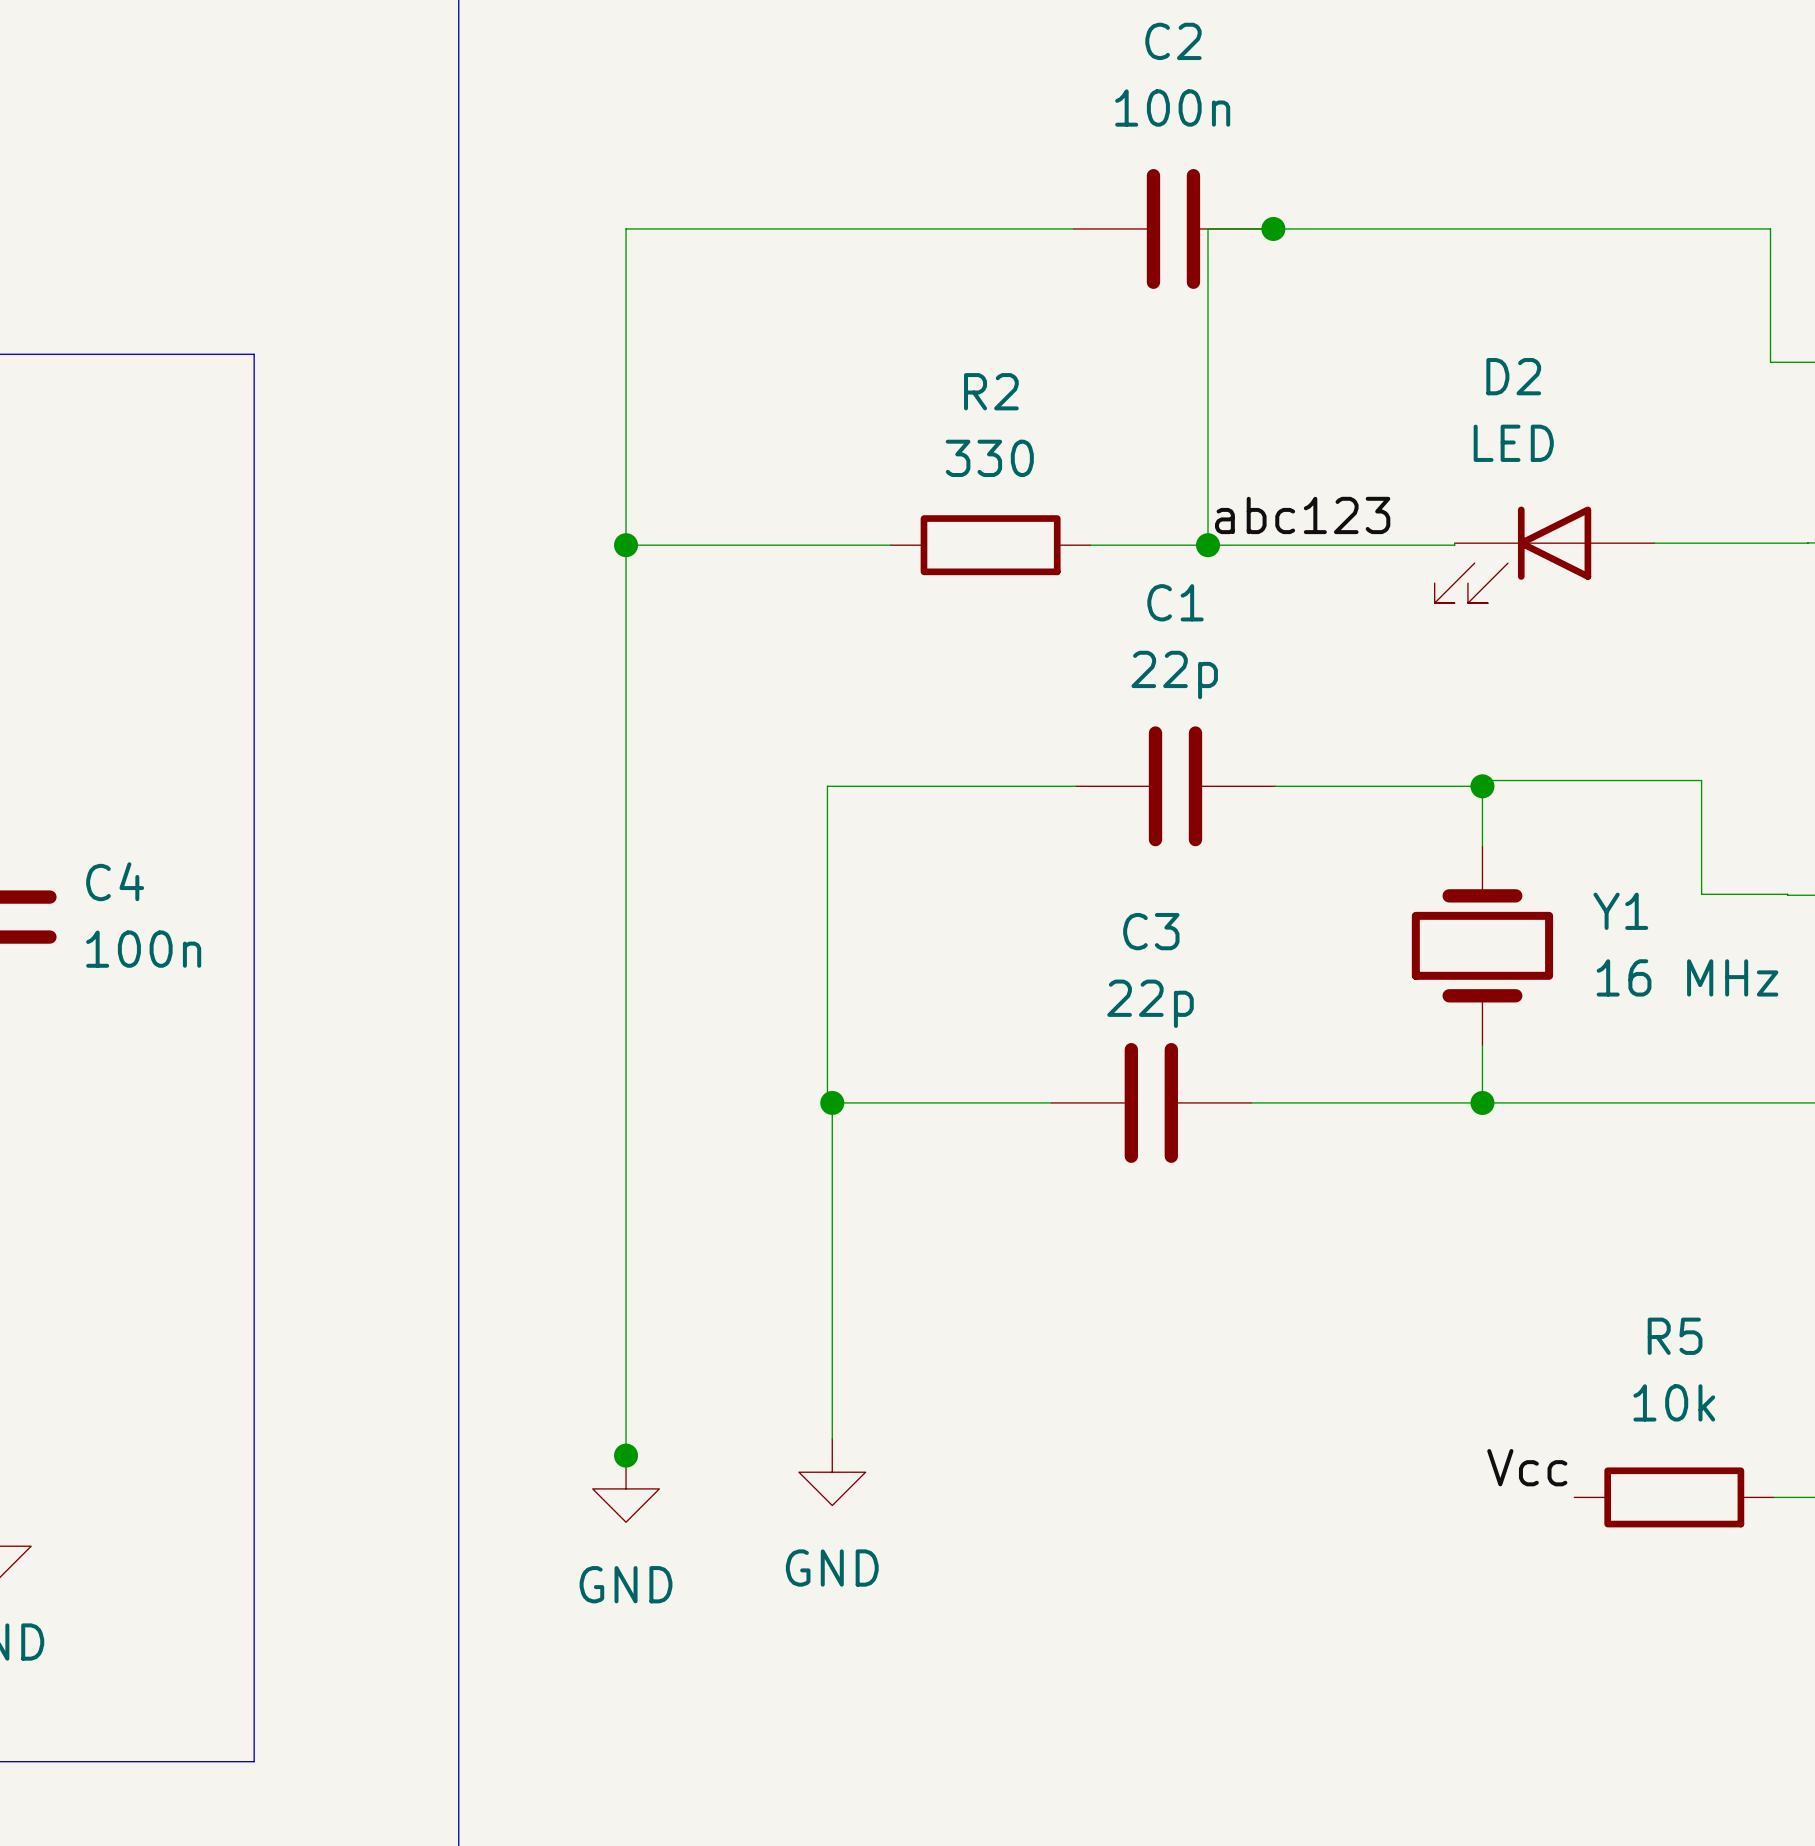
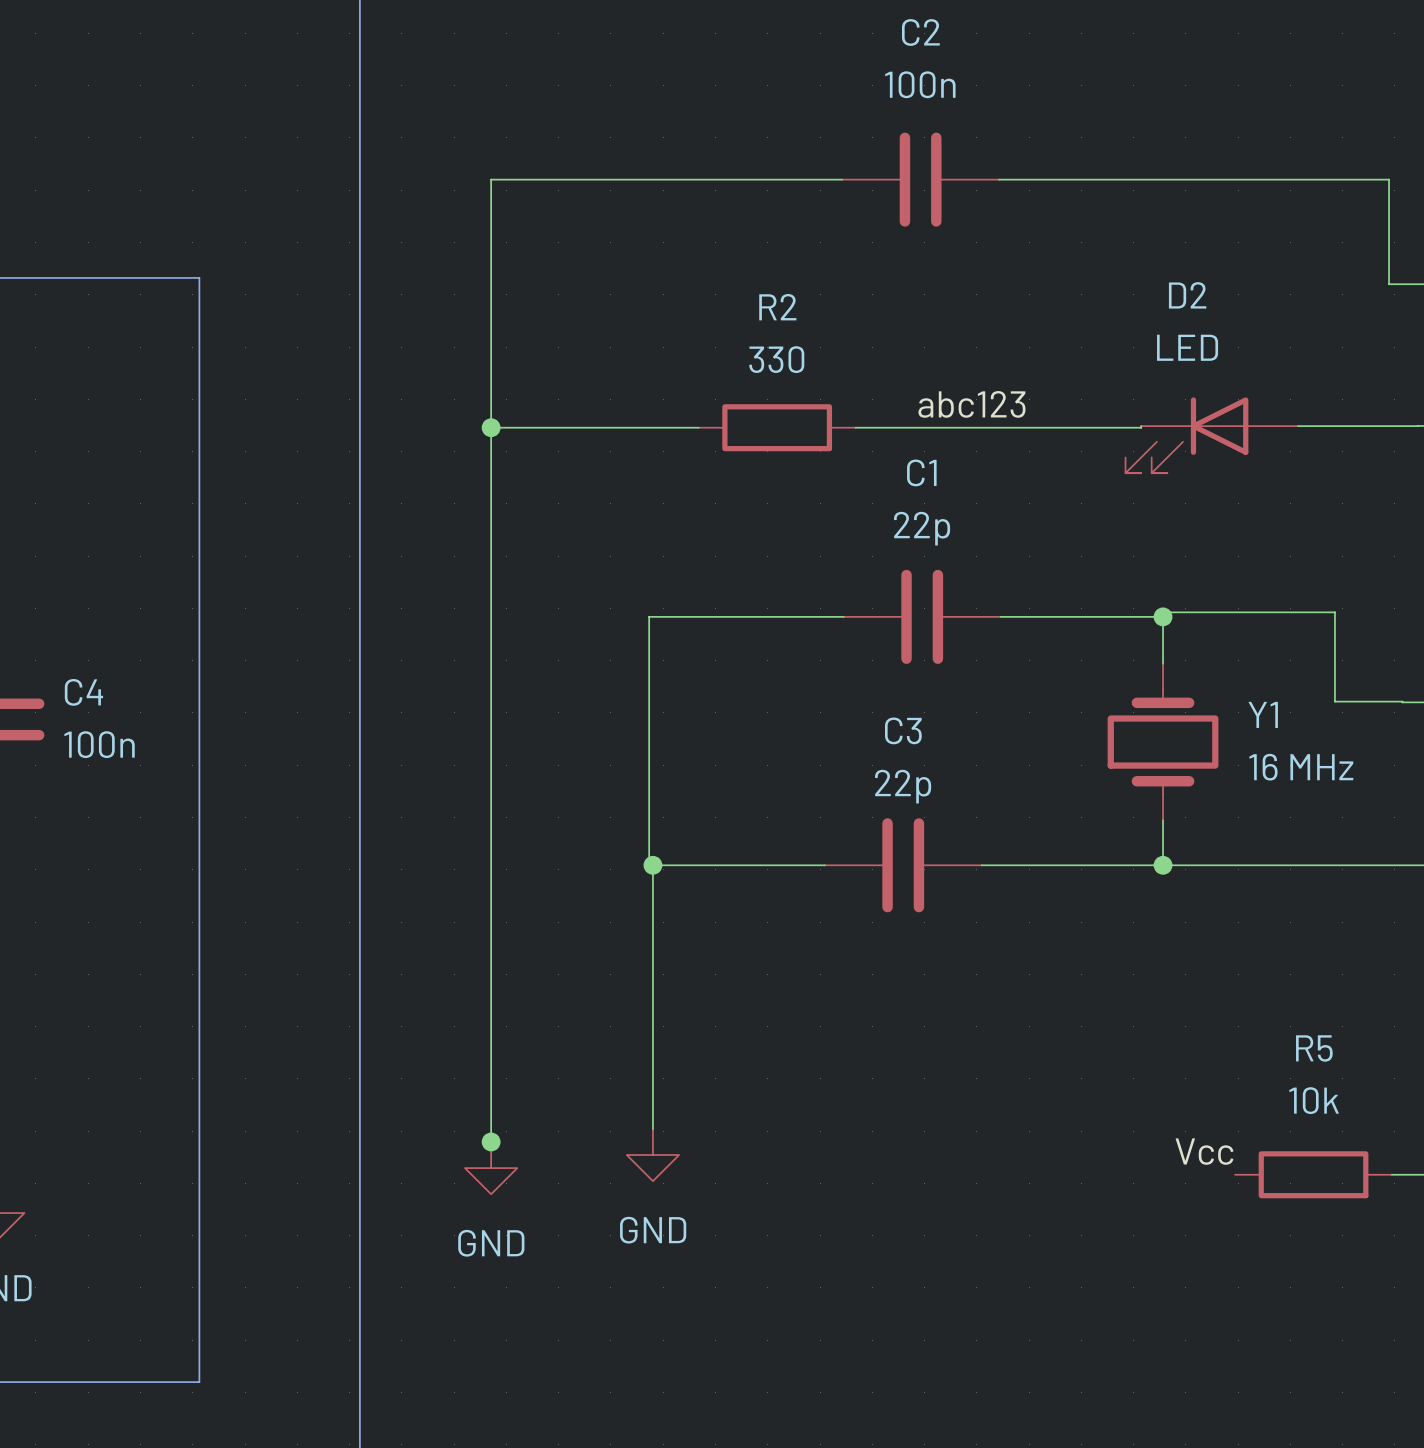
wire: (1273, 228) (1208, 228) (1208, 545) -> none
junction: (1273, 228) -> none
label position: abc123 (1302, 515) -> abc123 (971, 404)
junction: (1208, 545) -> none

